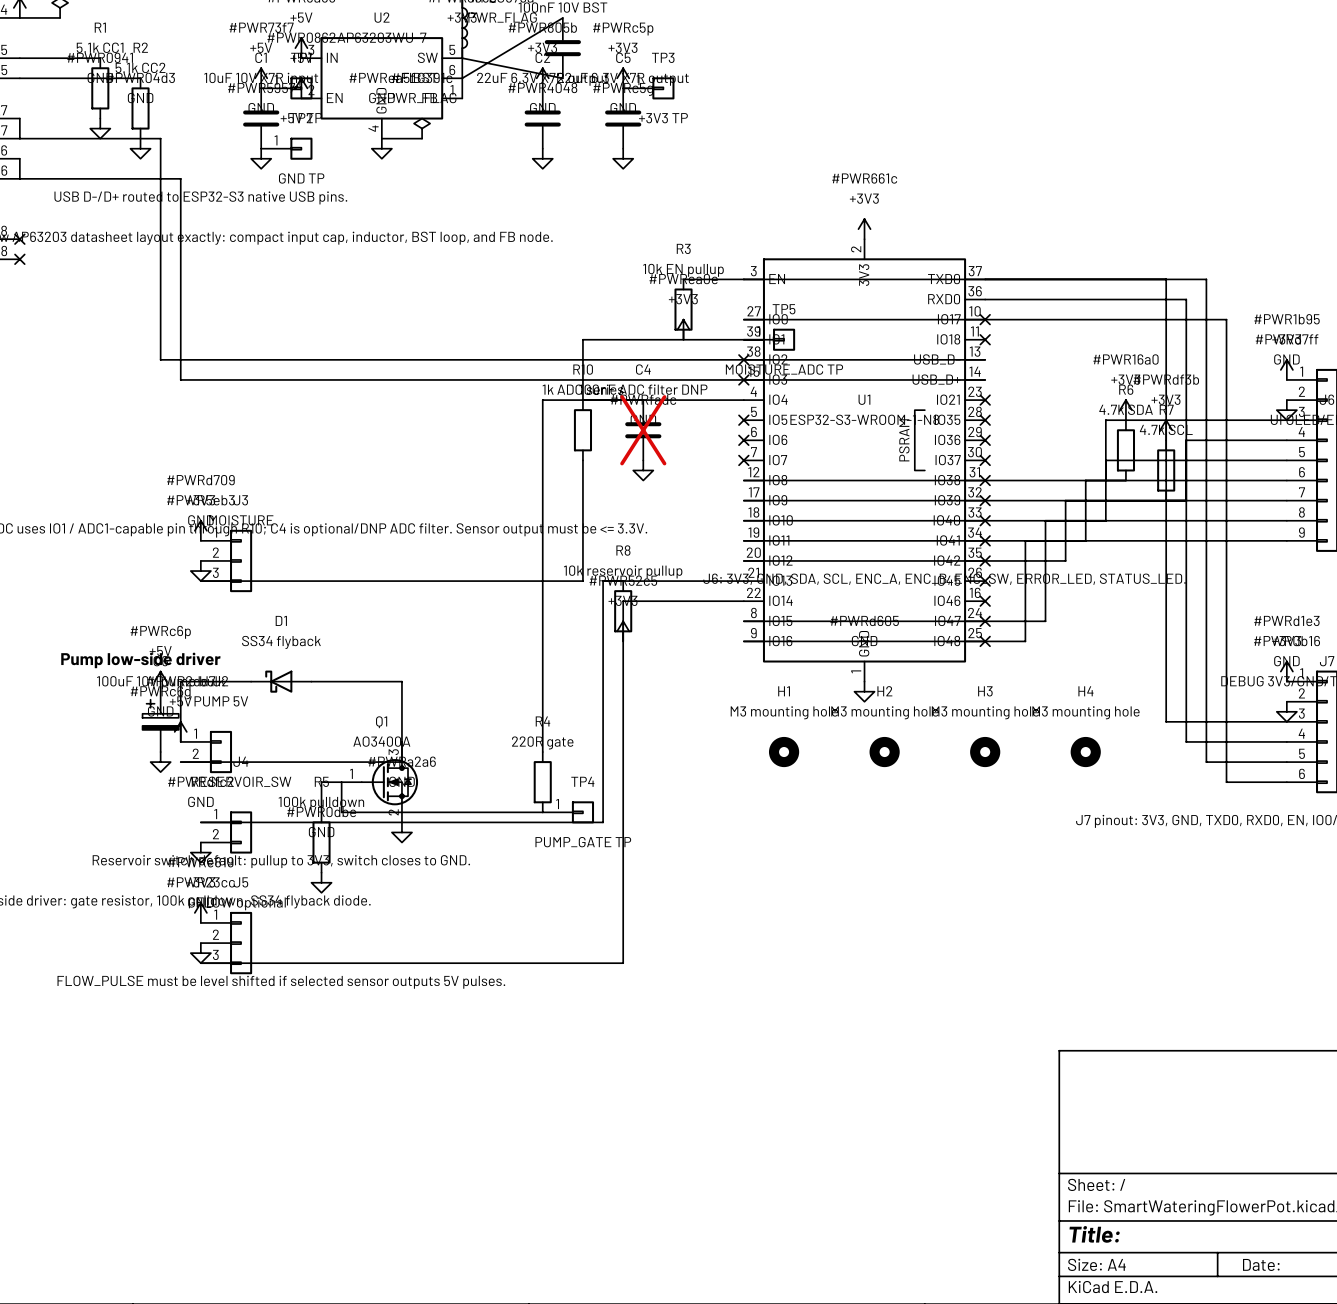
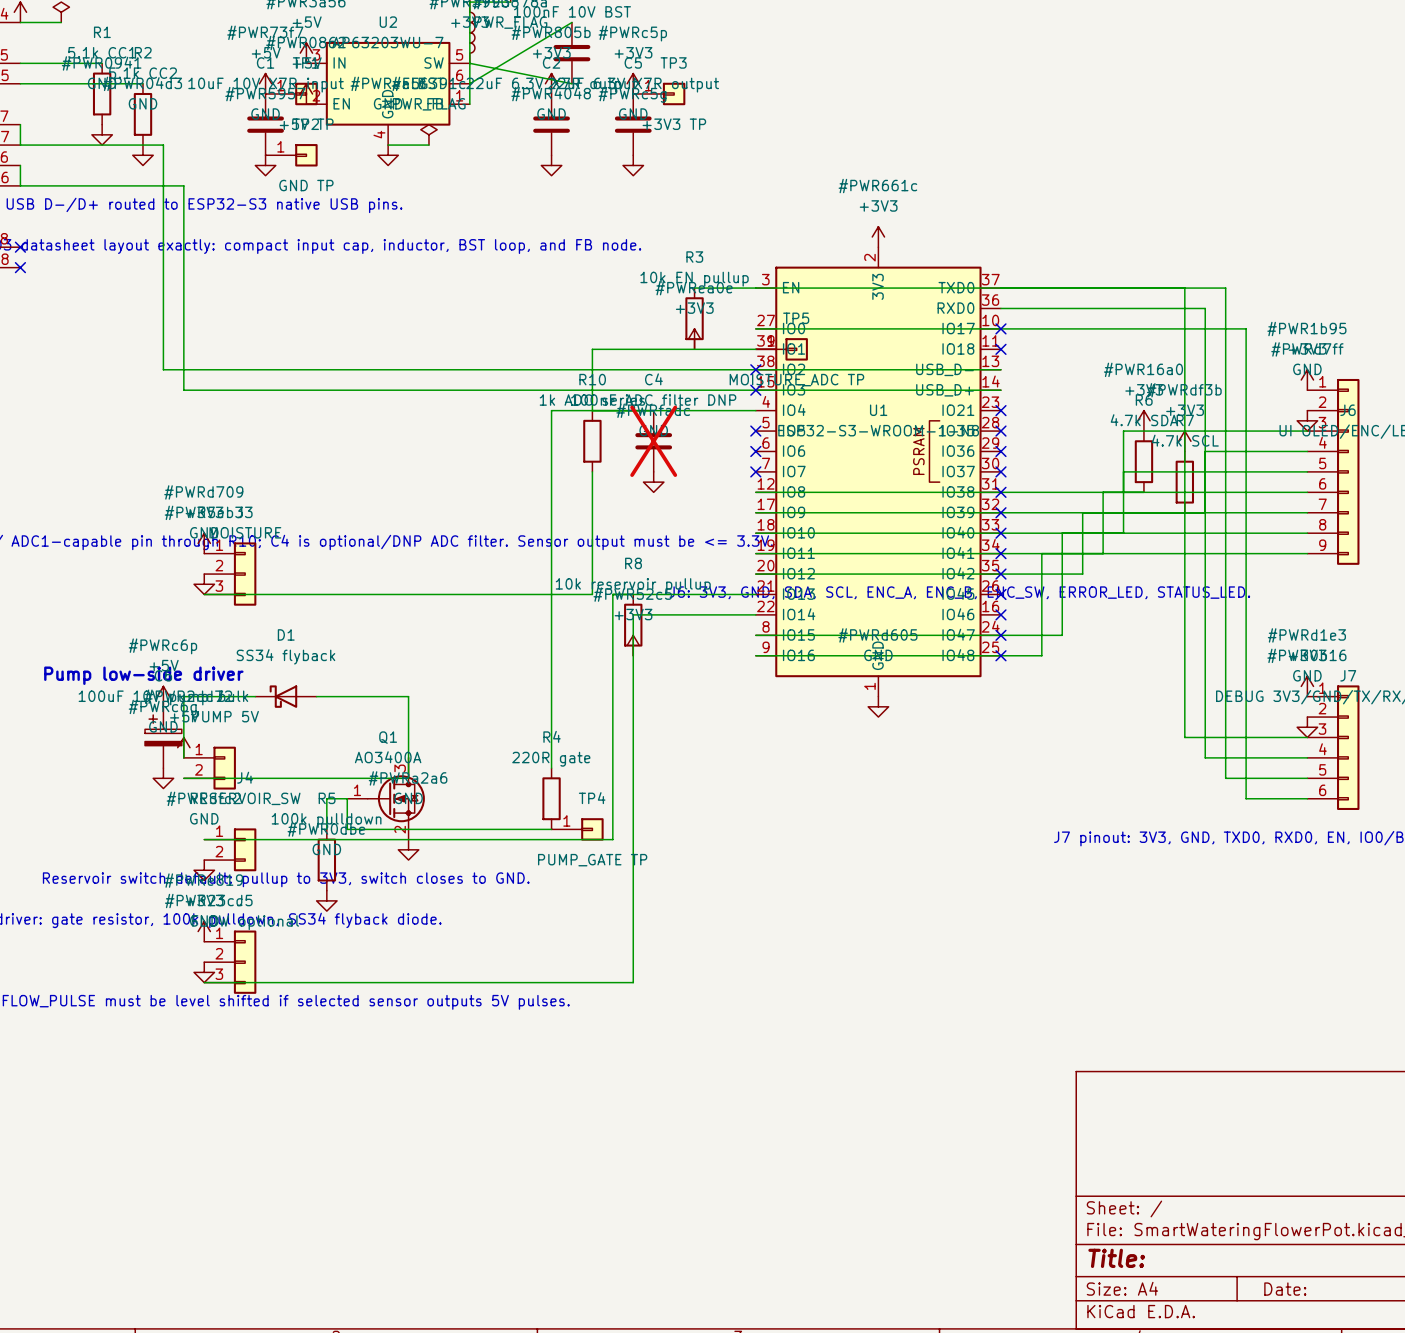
H1: M3 mounting hole (784, 752) -> none
H2: M3 mounting hole (884, 752) -> none
H3: M3 mounting hole (985, 752) -> none
H4: M3 mounting hole (1085, 752) -> none

